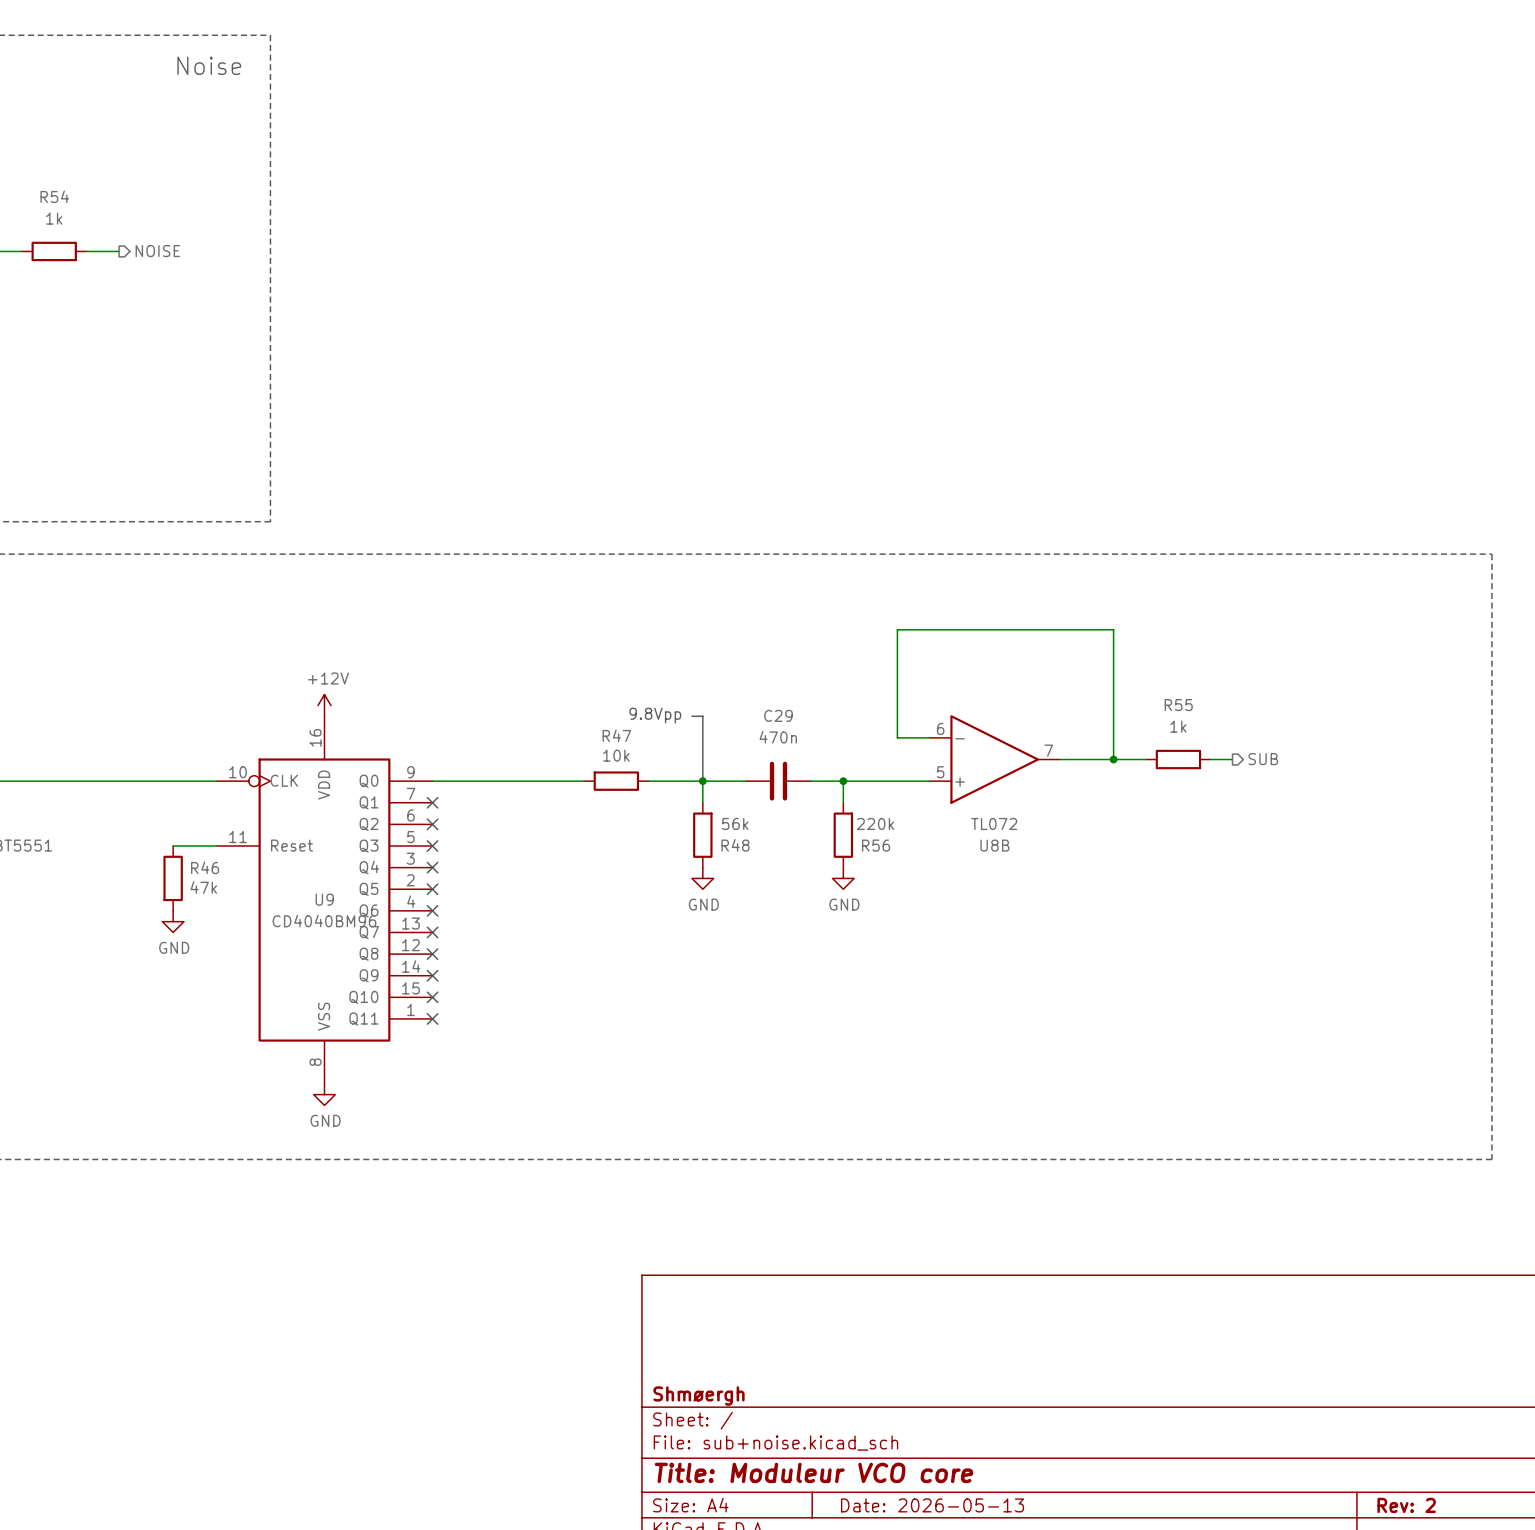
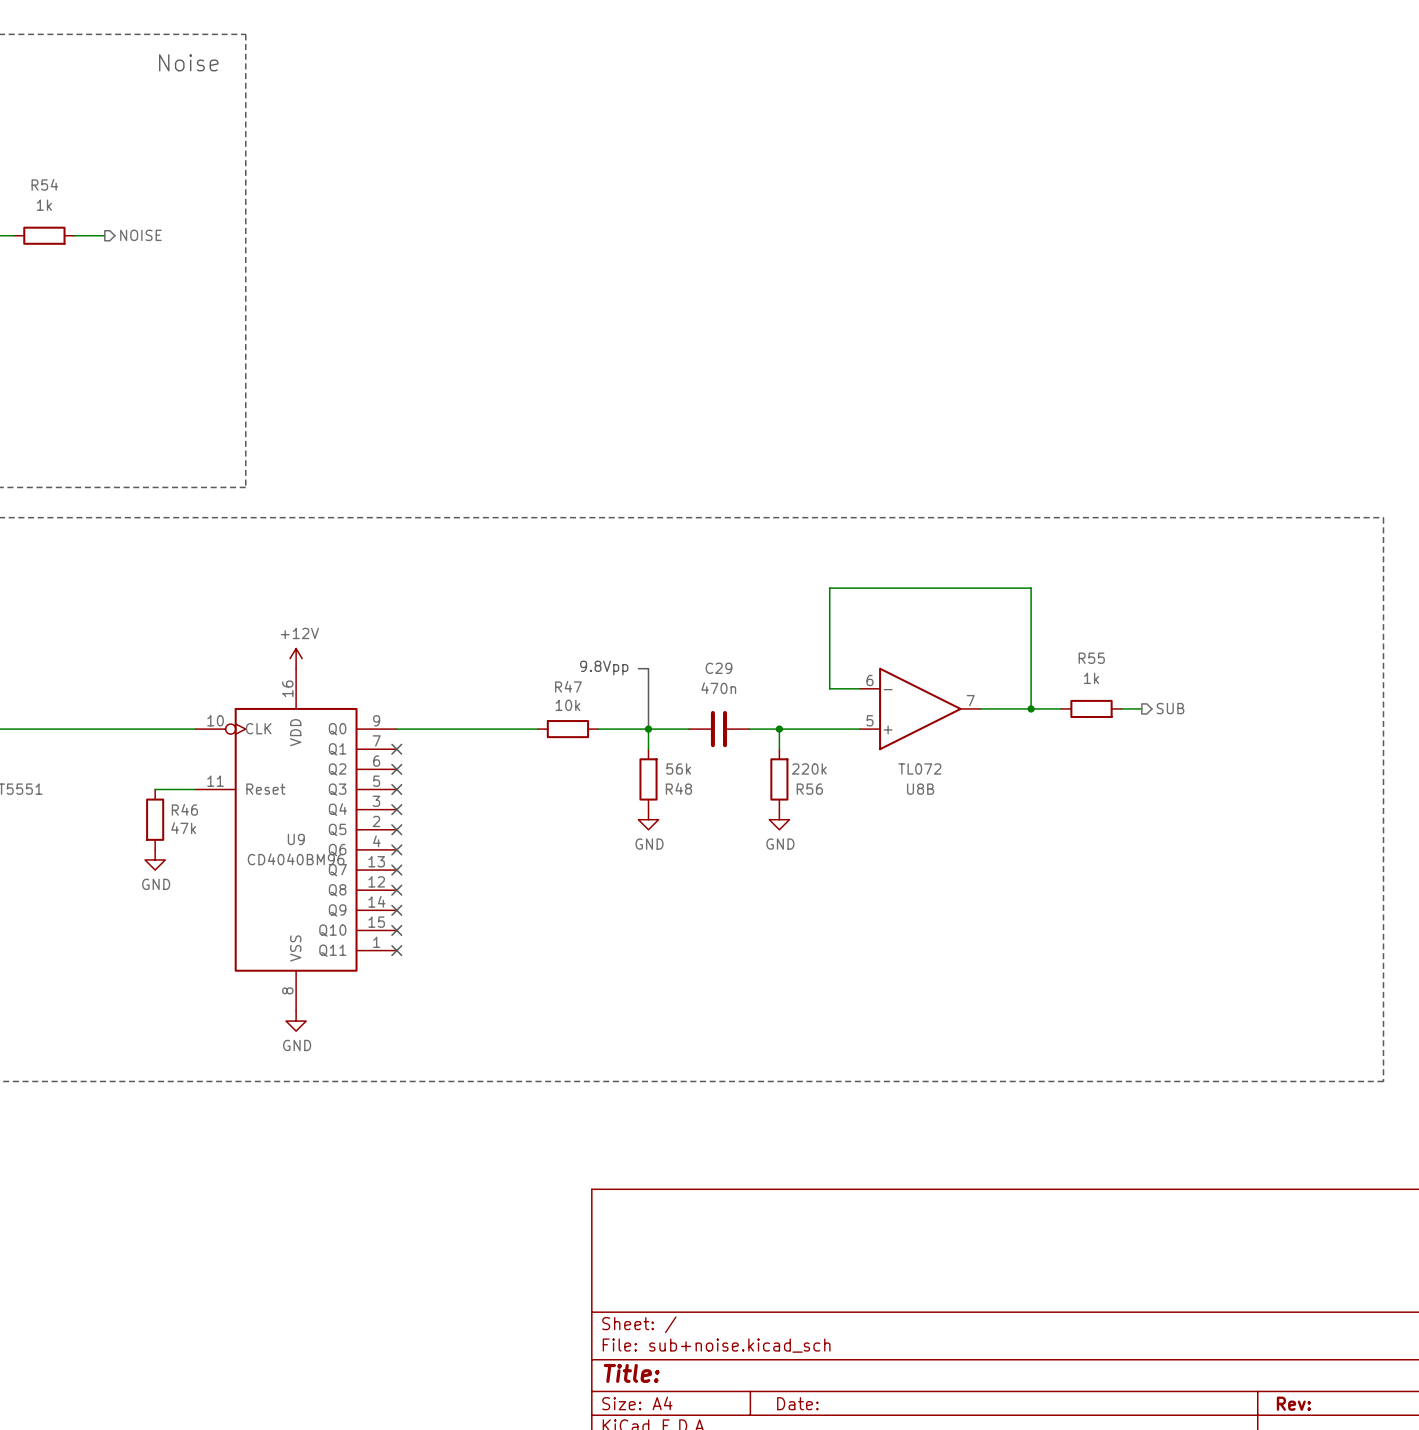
title block: Shmøergh (698, 1396) -> none
title block: Title: Moduleur VCO core (814, 1472) -> Title: (631, 1373)
title block: Date: 2026-05-13 (932, 1505) -> Date: (797, 1403)
title block: Rev: 2 (1406, 1505) -> Rev: (1293, 1403)

